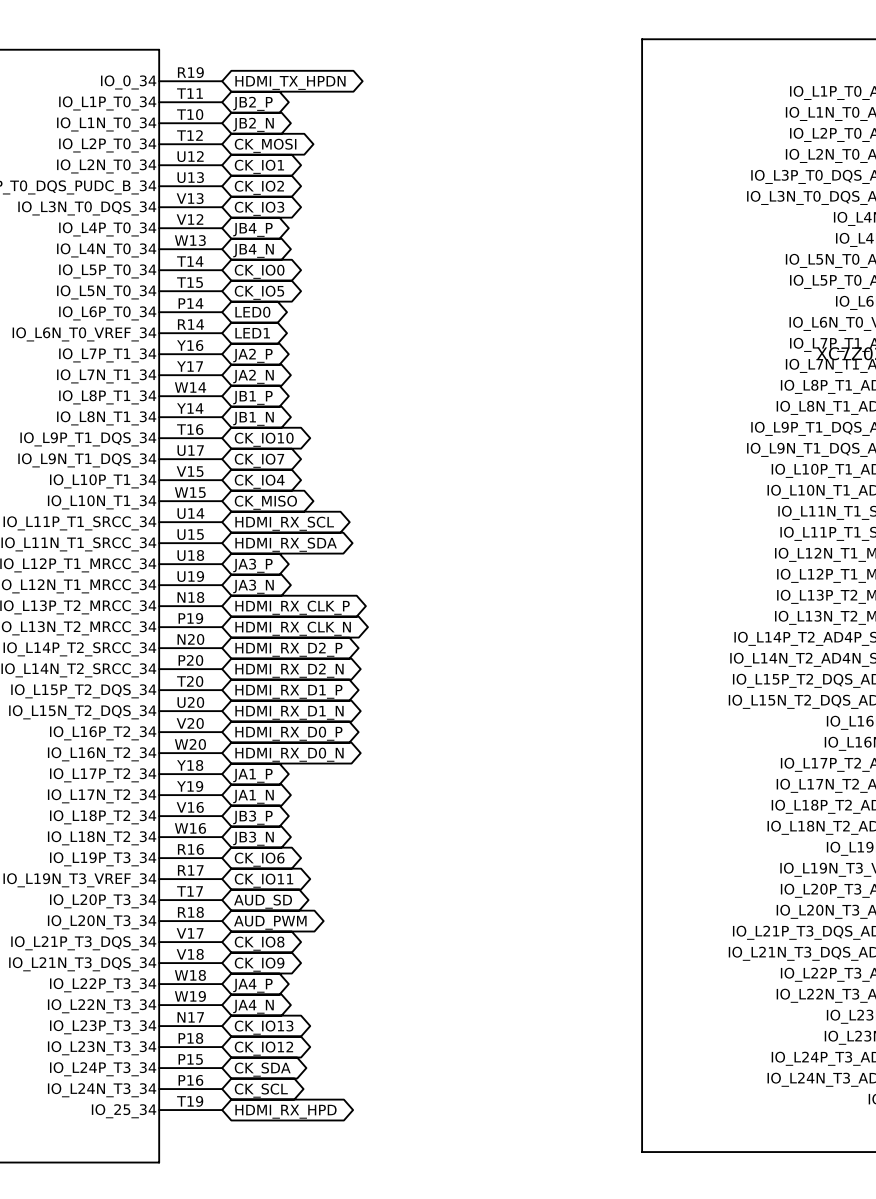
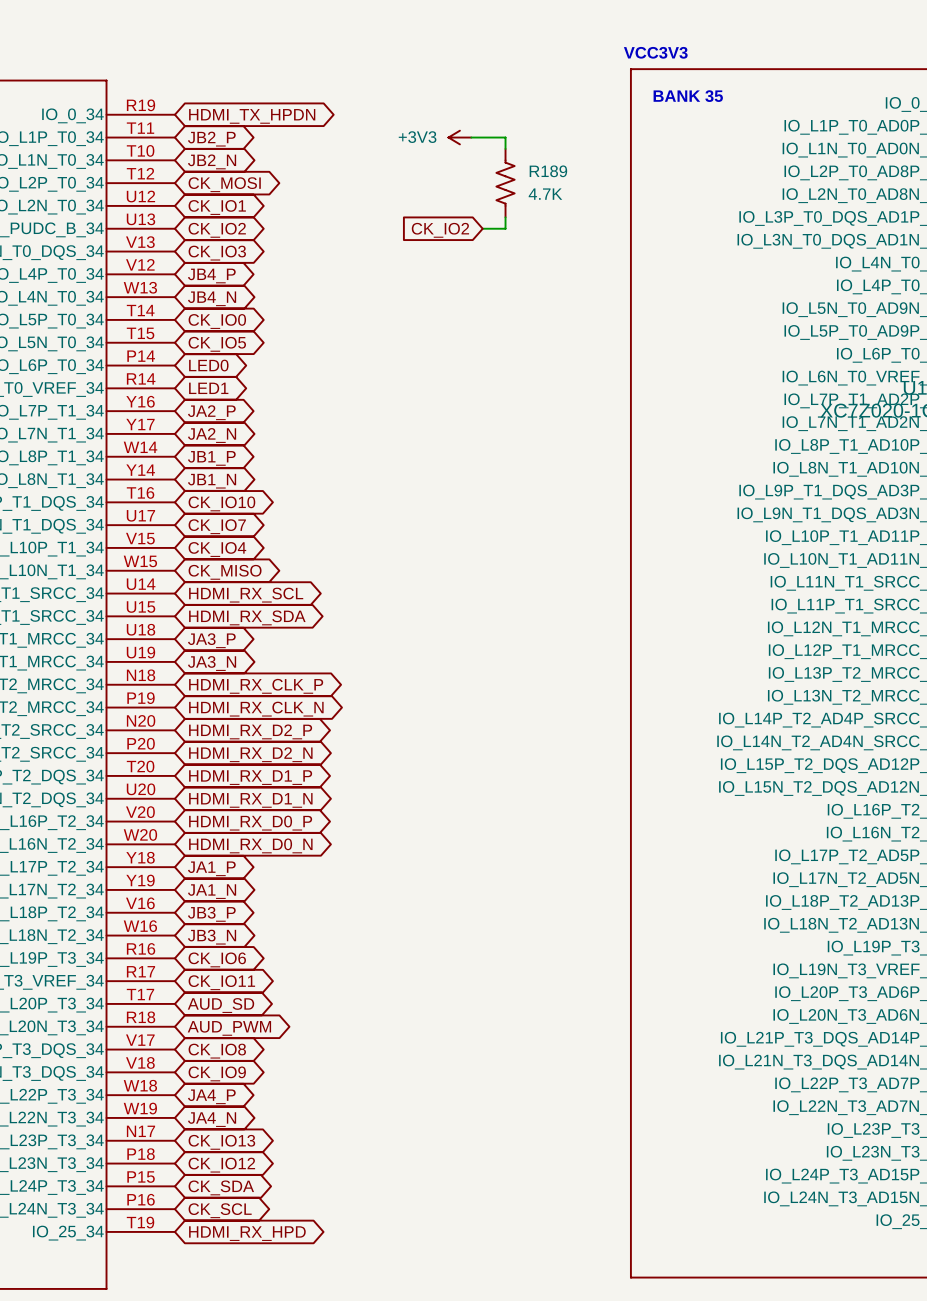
text: none -> VCC3V3 (655, 52)
text: none -> BANK 35 (688, 96)
power symbol: none -> +3V3 (459, 137)
wire: none -> (471, 137) (505, 137) (505, 148)
R189: none -> 4.7K (505, 183)
wire: none -> (505, 217) (505, 228) (482, 228)
global label: none -> CK_IO2 (440, 230)

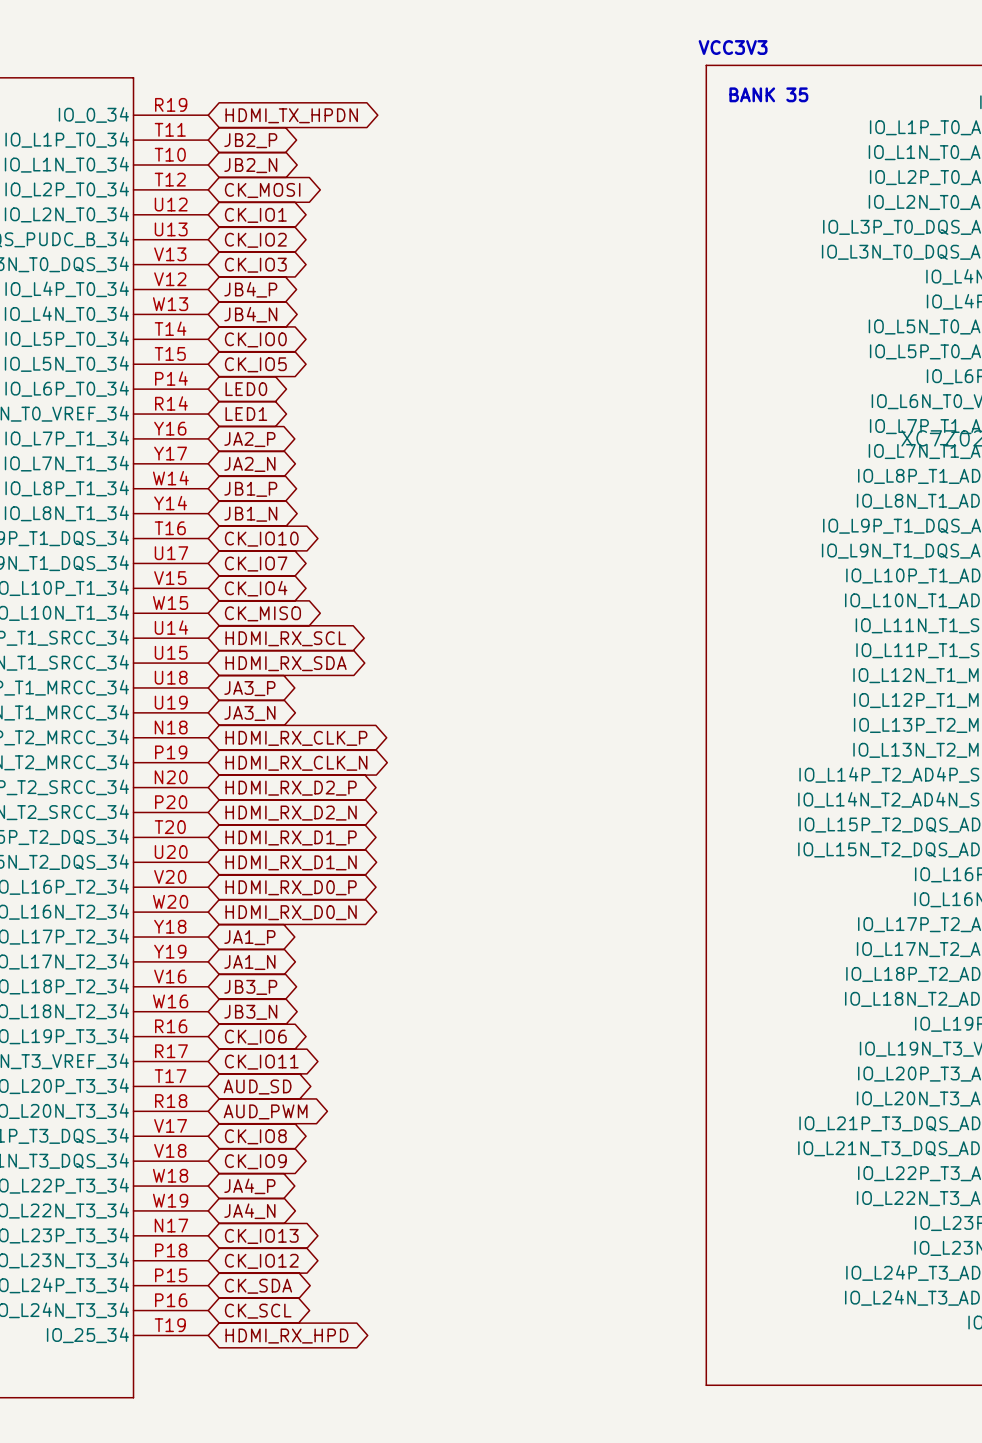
power symbol: +3V3 (459, 137) -> none
wire: (471, 137) (505, 137) (505, 148) -> none
R189: 4.7K (505, 183) -> none
wire: (505, 217) (505, 228) (482, 228) -> none
global label: CK_IO2 (440, 230) -> none

